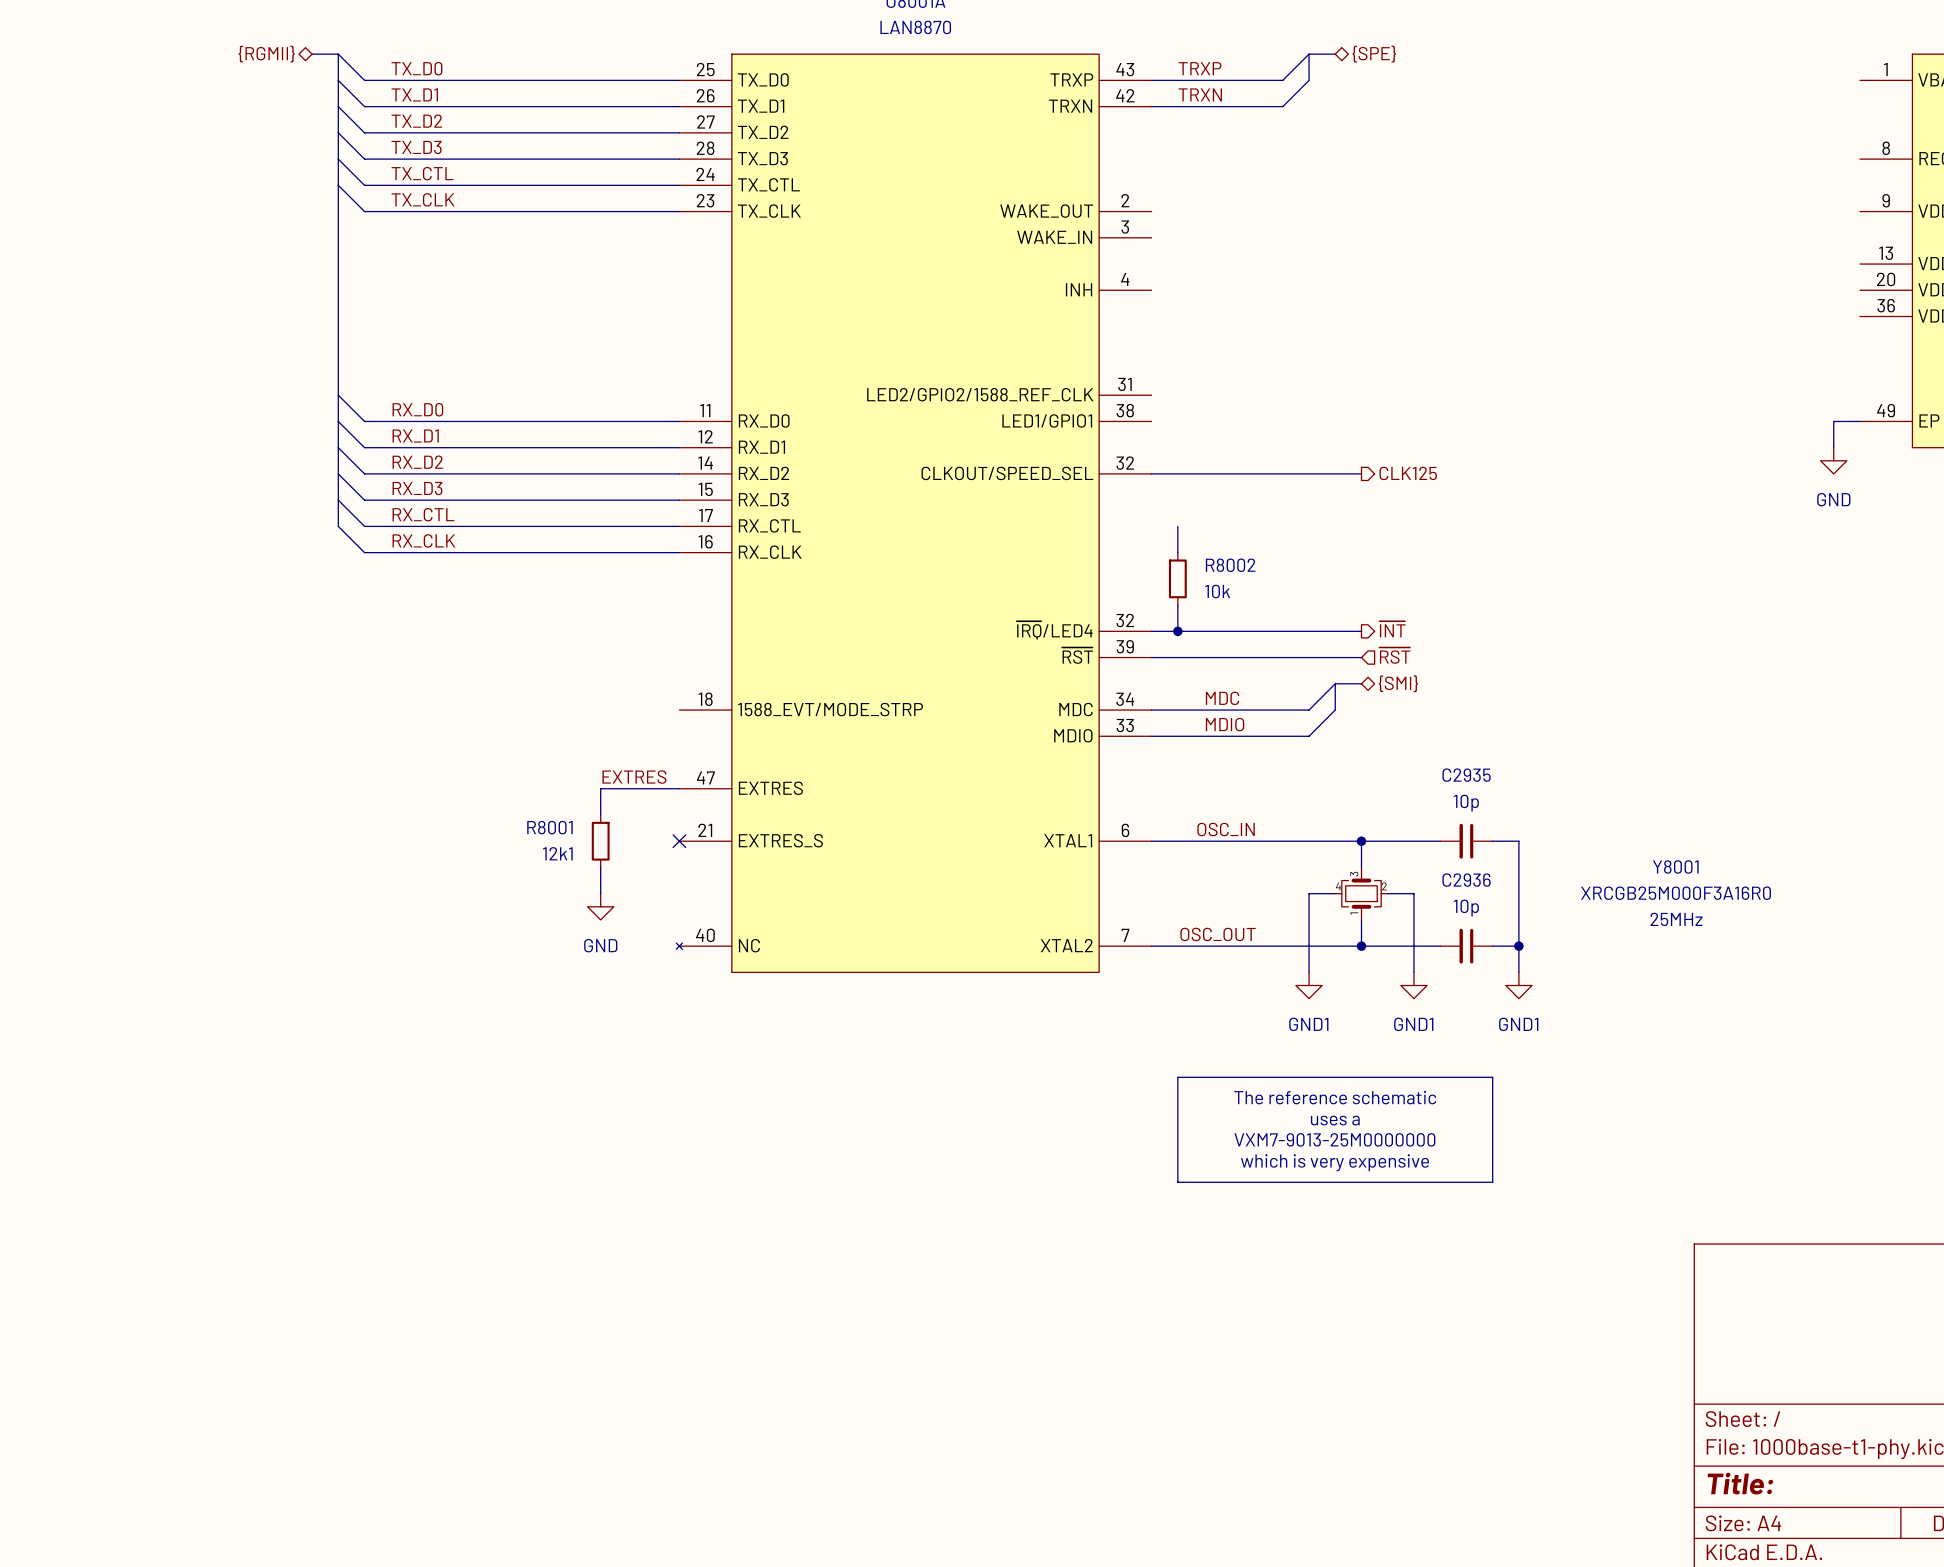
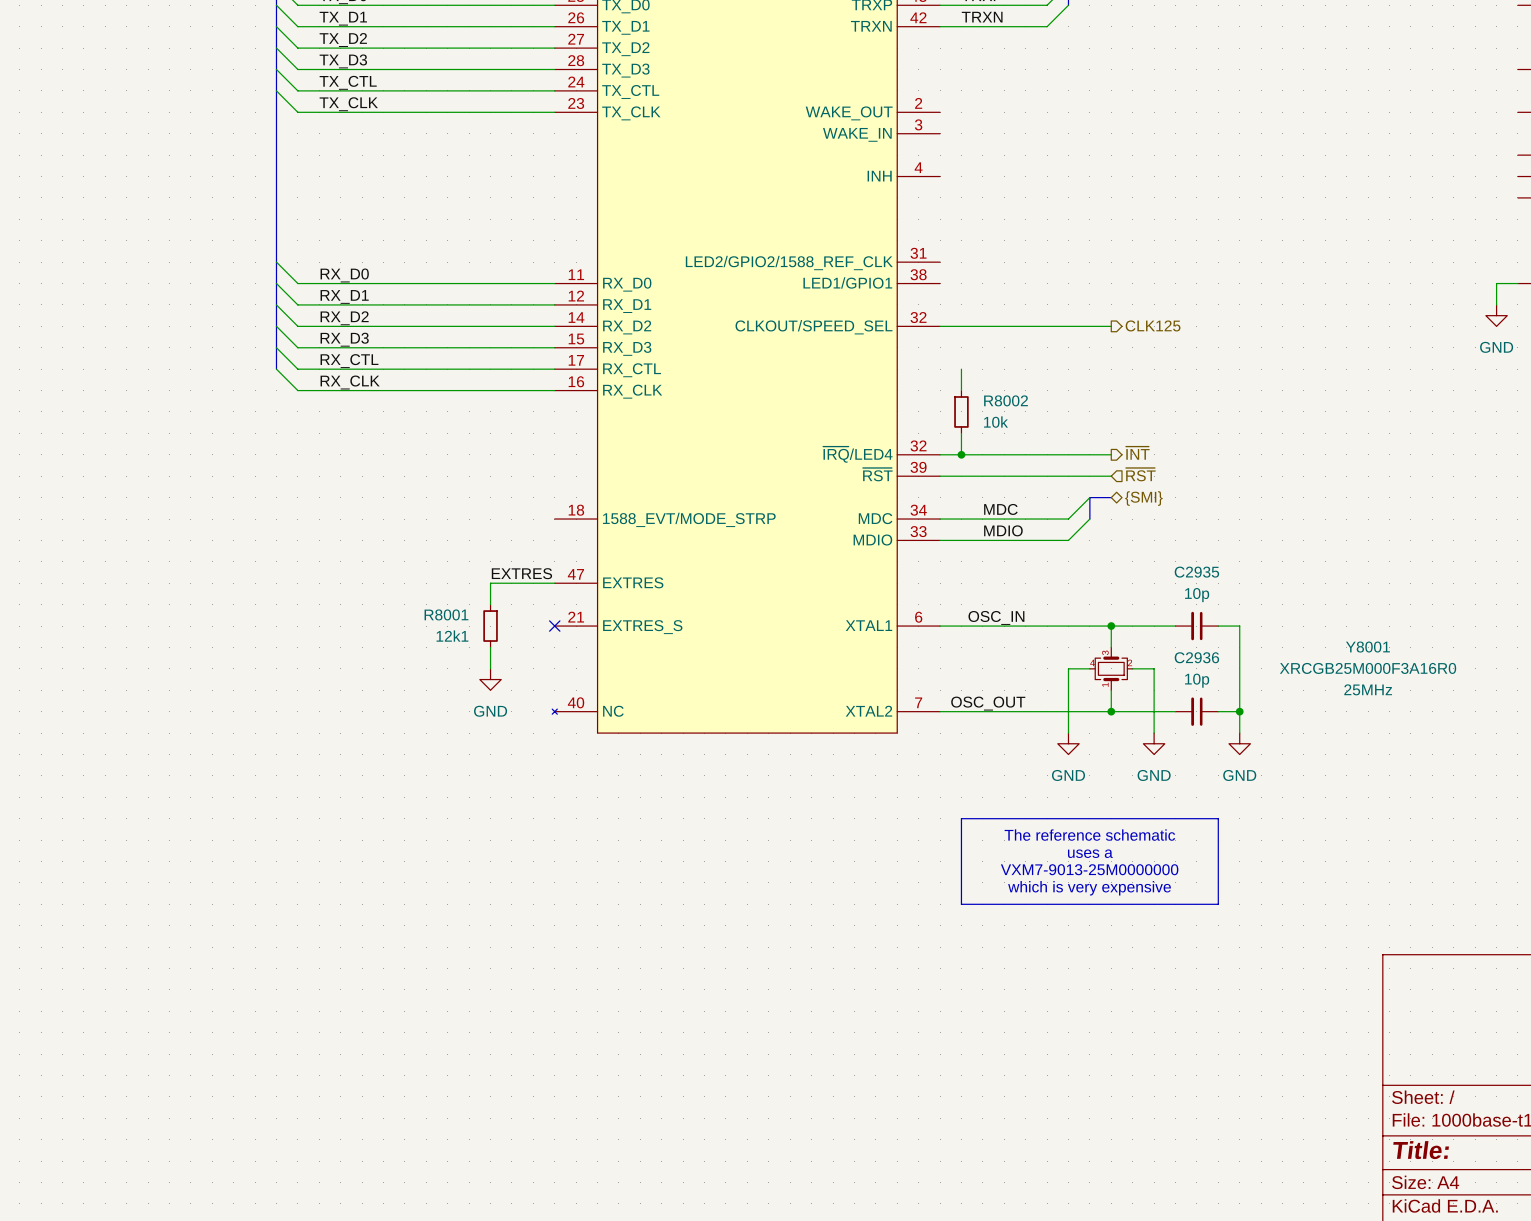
power symbol: GND1 (1309, 985) -> GND (1068, 743)
power symbol: GND1 (1413, 985) -> GND (1154, 743)
power symbol: GND1 (1518, 985) -> GND (1239, 743)

